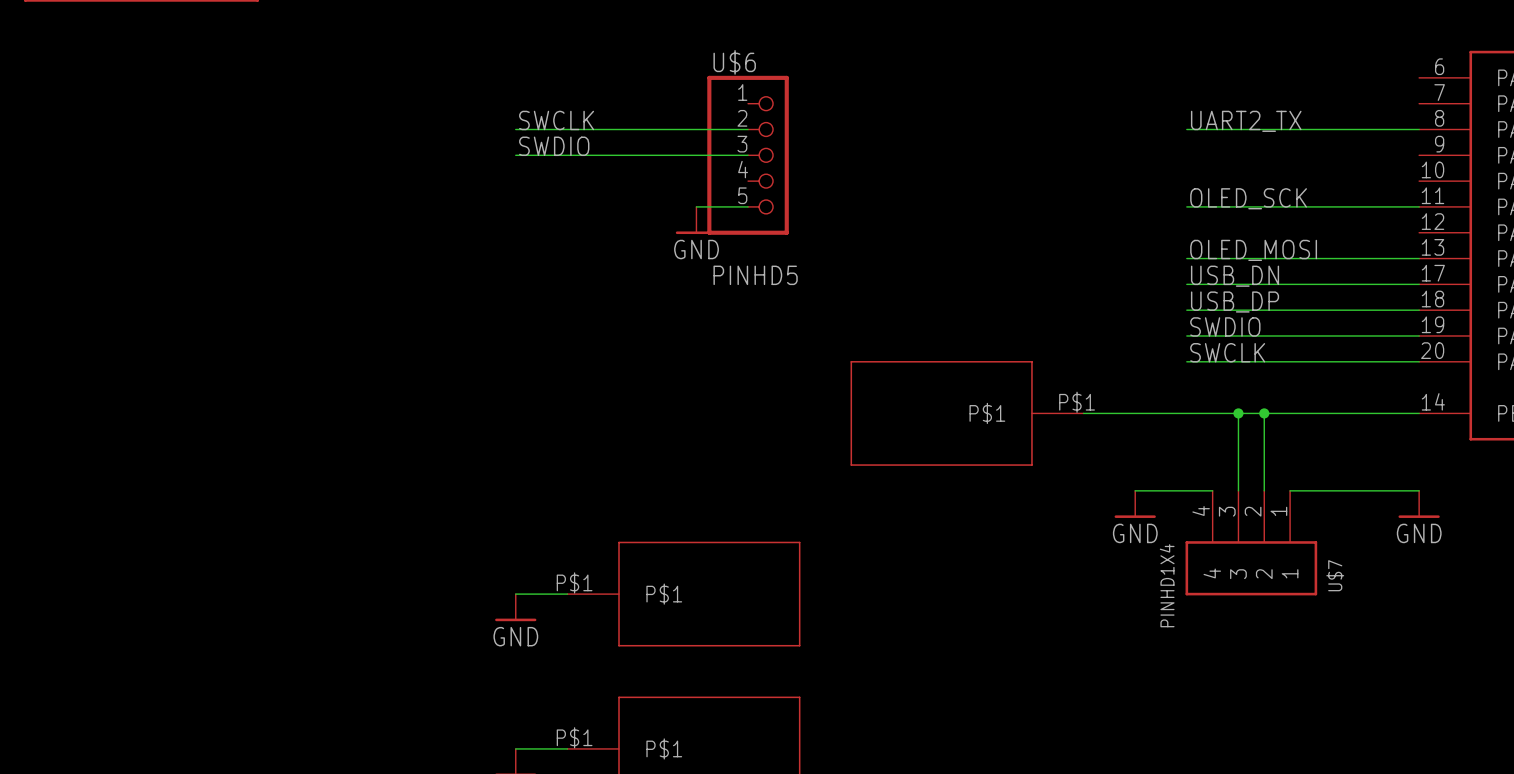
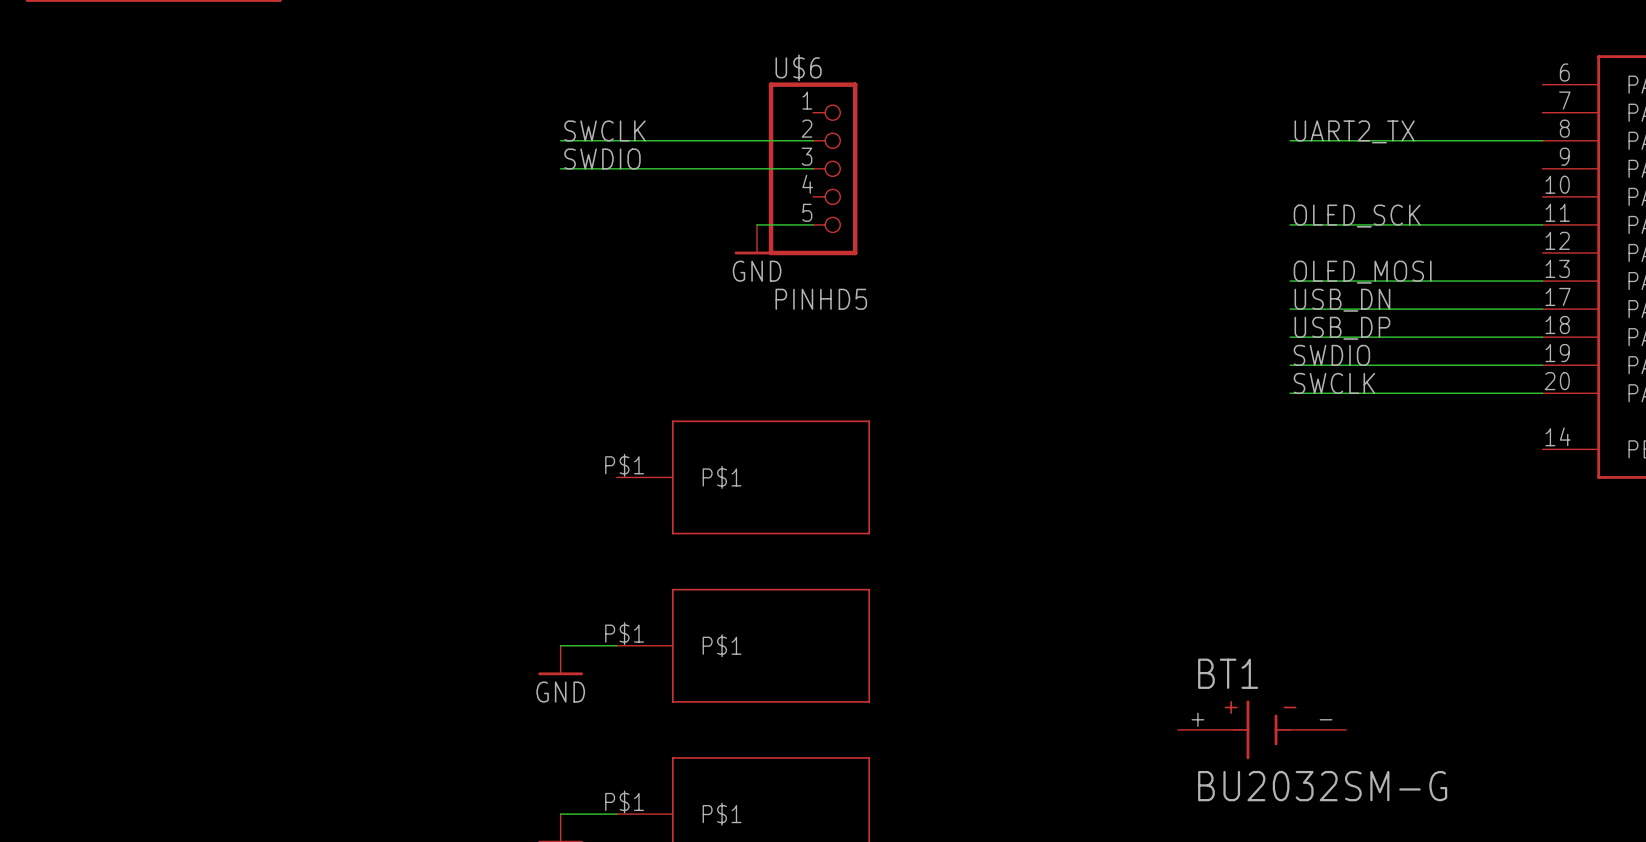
part: (967, 413) -> none
wire: (1083, 413) (1419, 413) -> none
wire: (1238, 413) (1238, 490) -> none
junction: (1238, 413) -> none
wire: (1264, 413) (1264, 490) -> none
junction: (1264, 413) -> none
part: none -> (743, 477)
wire: (1135, 490) (1212, 490) -> none
wire: (1290, 490) (1419, 490) -> none
power symbol: GND (1135, 504) -> none
power symbol: GND (1419, 504) -> none
U$7: PINHD1X4 (1251, 543) -> none
BT1: none -> BU2032SM-G (1262, 729)

